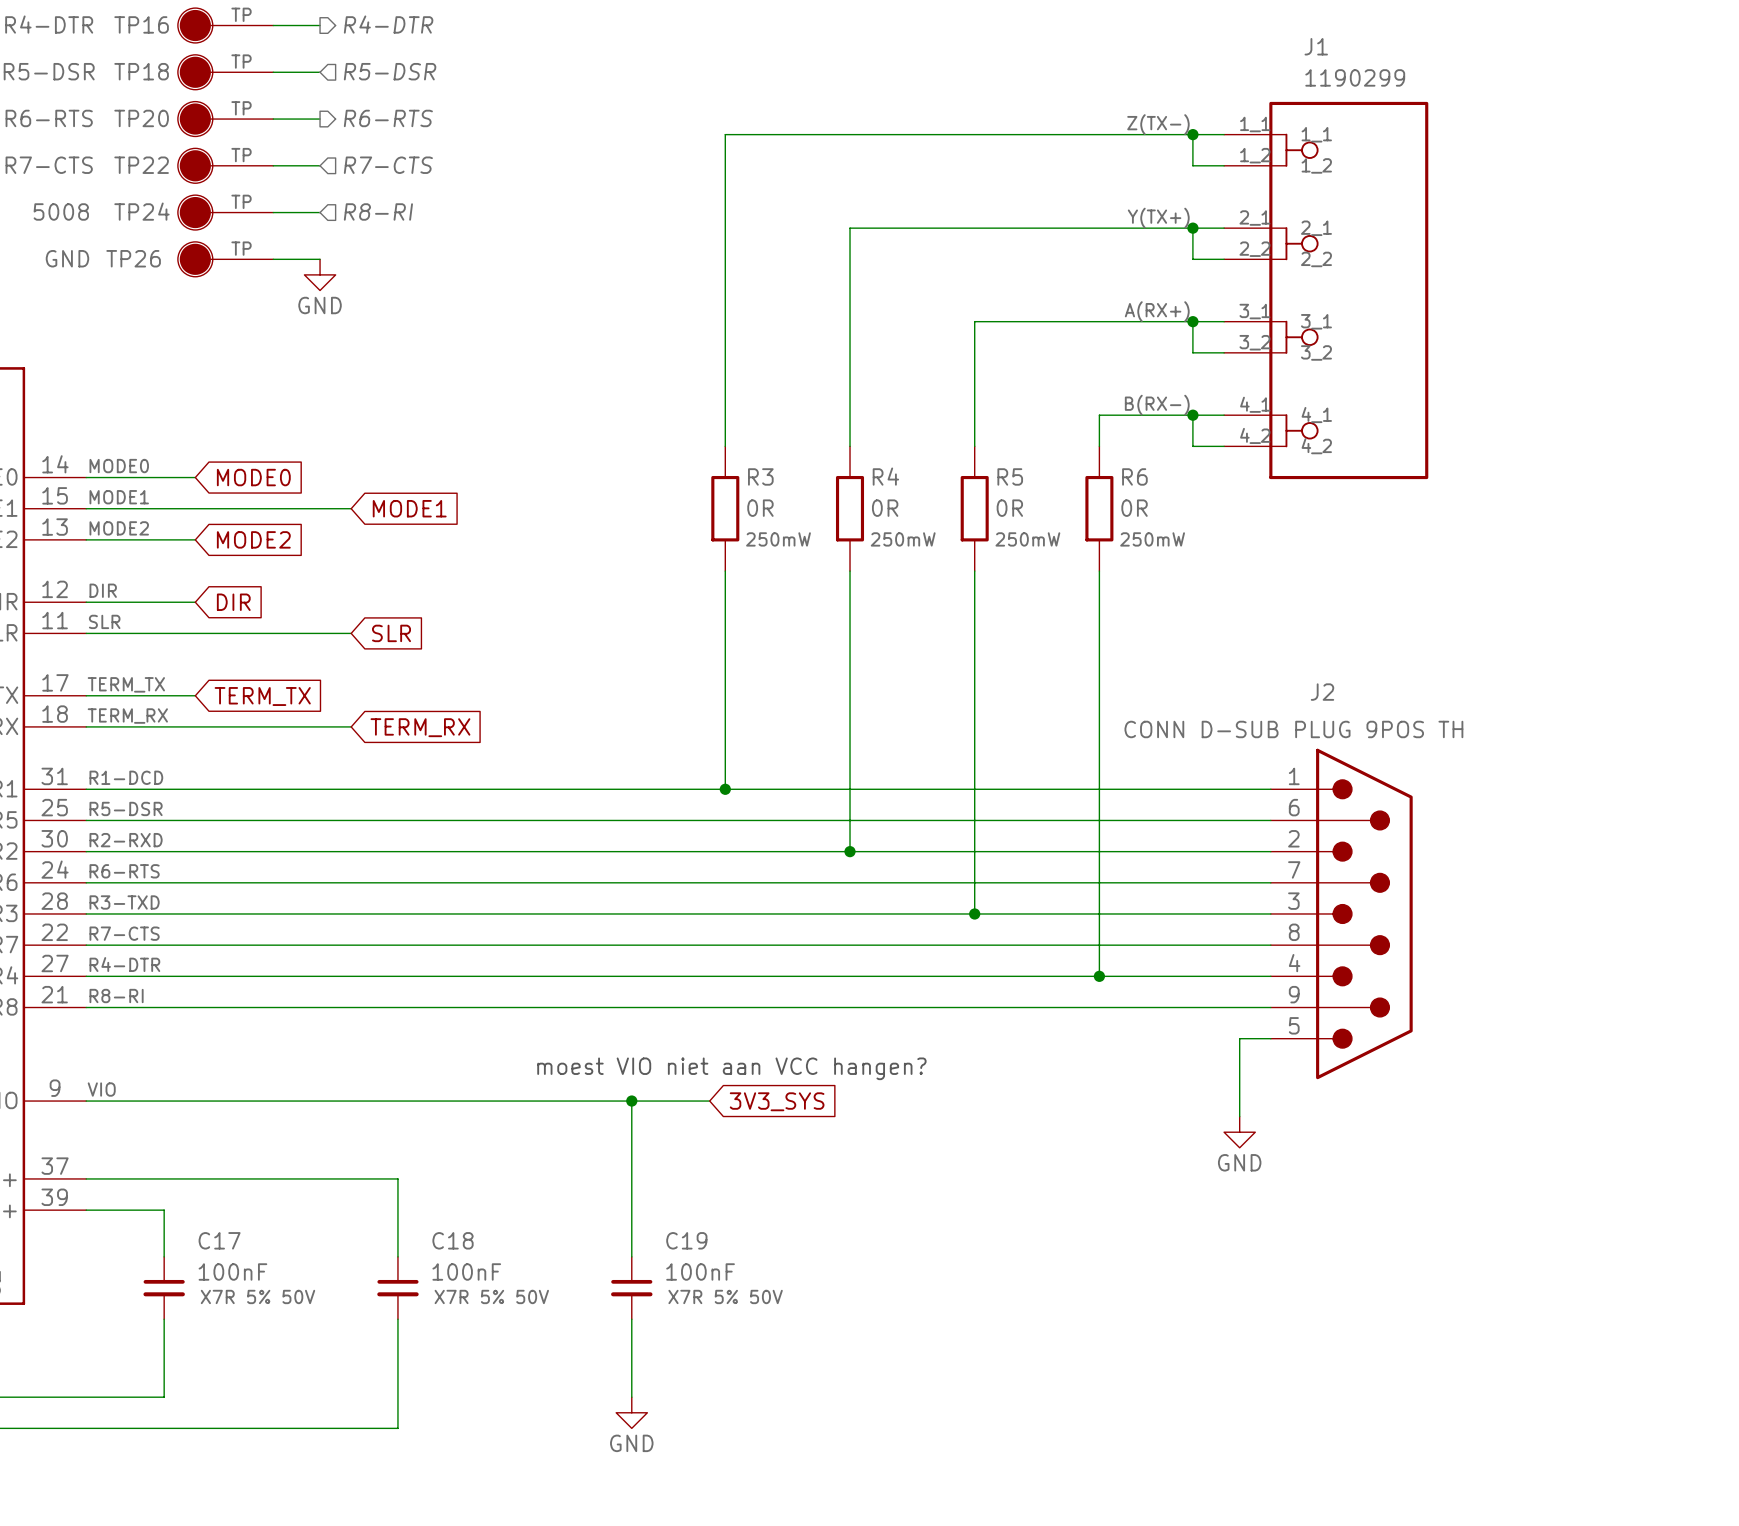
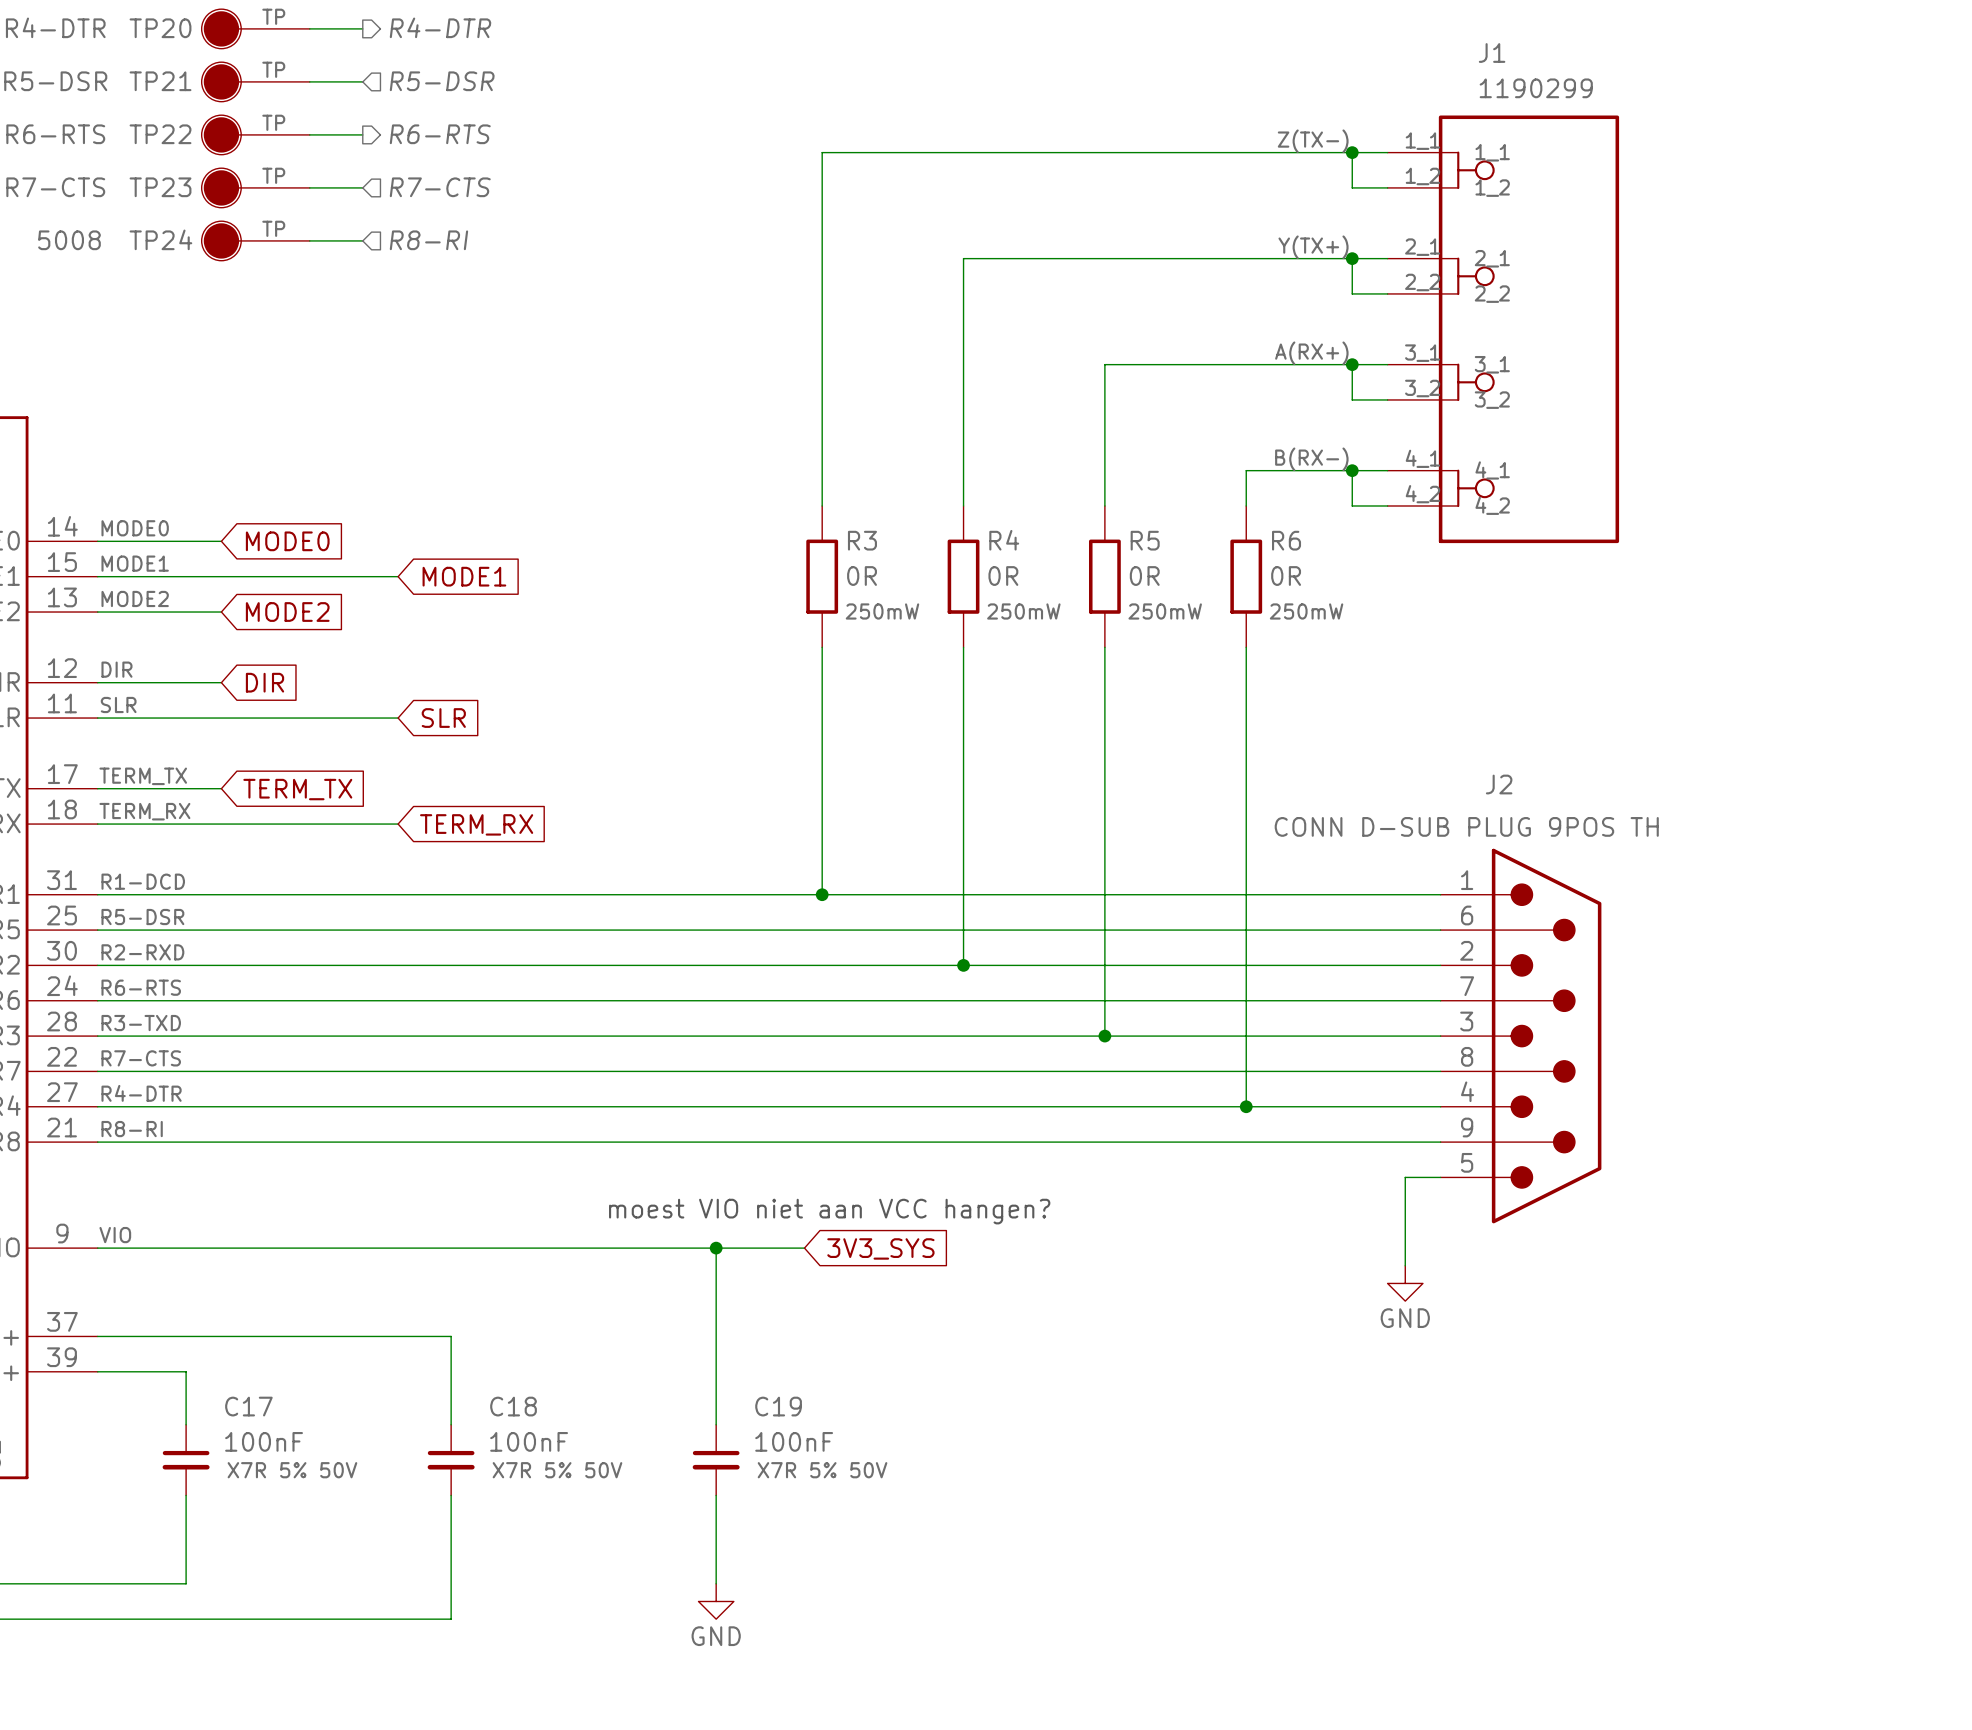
TP16 name: TP16 (141, 24) -> TP20 (160, 28)
TP18 name: TP18 (141, 71) -> TP21 (160, 81)
TP20 name: TP20 (141, 118) -> TP22 (160, 134)
TP22 name: TP22 (141, 165) -> TP23 (160, 187)
TP26: GND (225, 259) -> none
wire: (273, 259) (320, 259) -> none
power symbol: GND (320, 274) -> none

